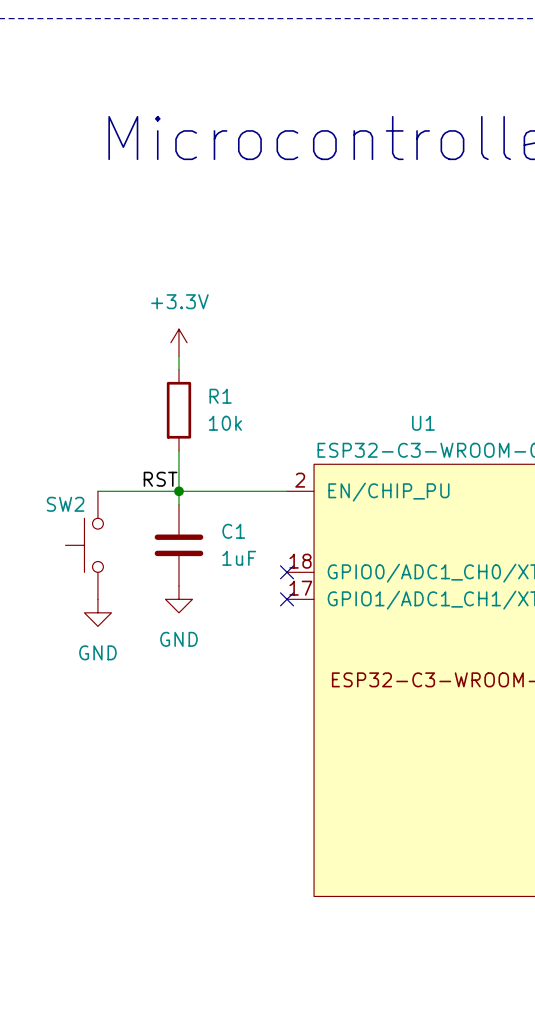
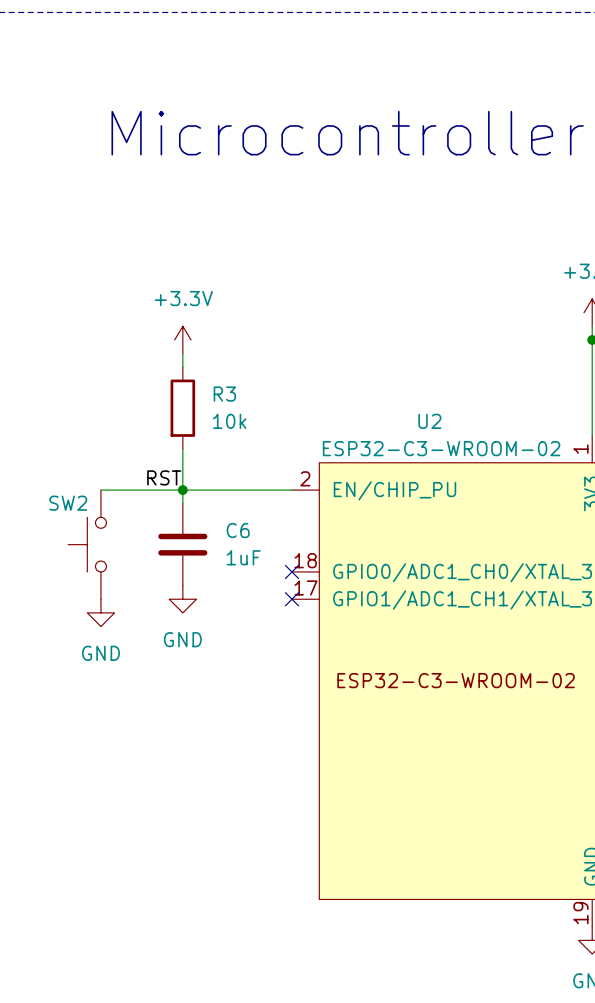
R1 name: R1 (220, 396) -> R3 (224, 394)
U1 name: U1 (423, 423) -> U2 (429, 421)
C1 name: C1 (233, 531) -> C6 (238, 530)

